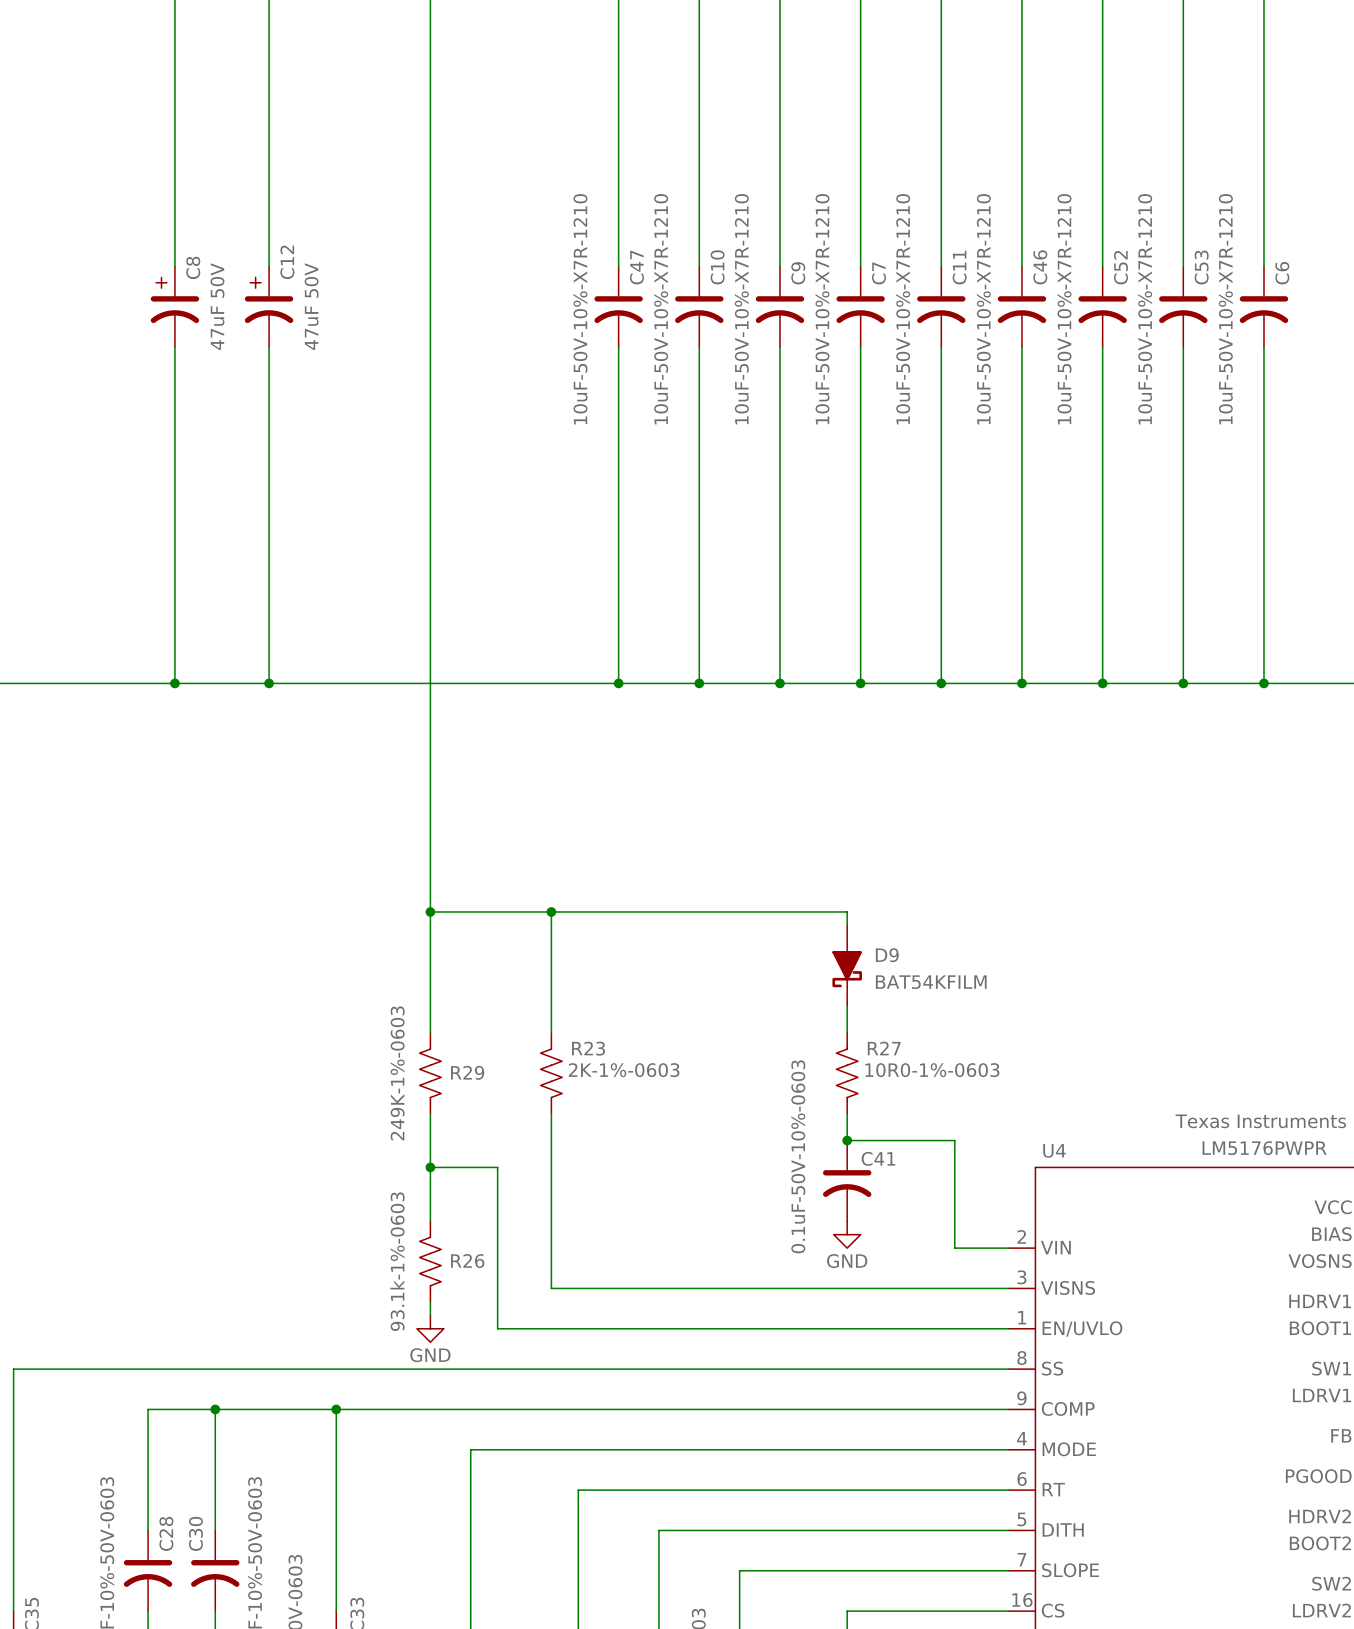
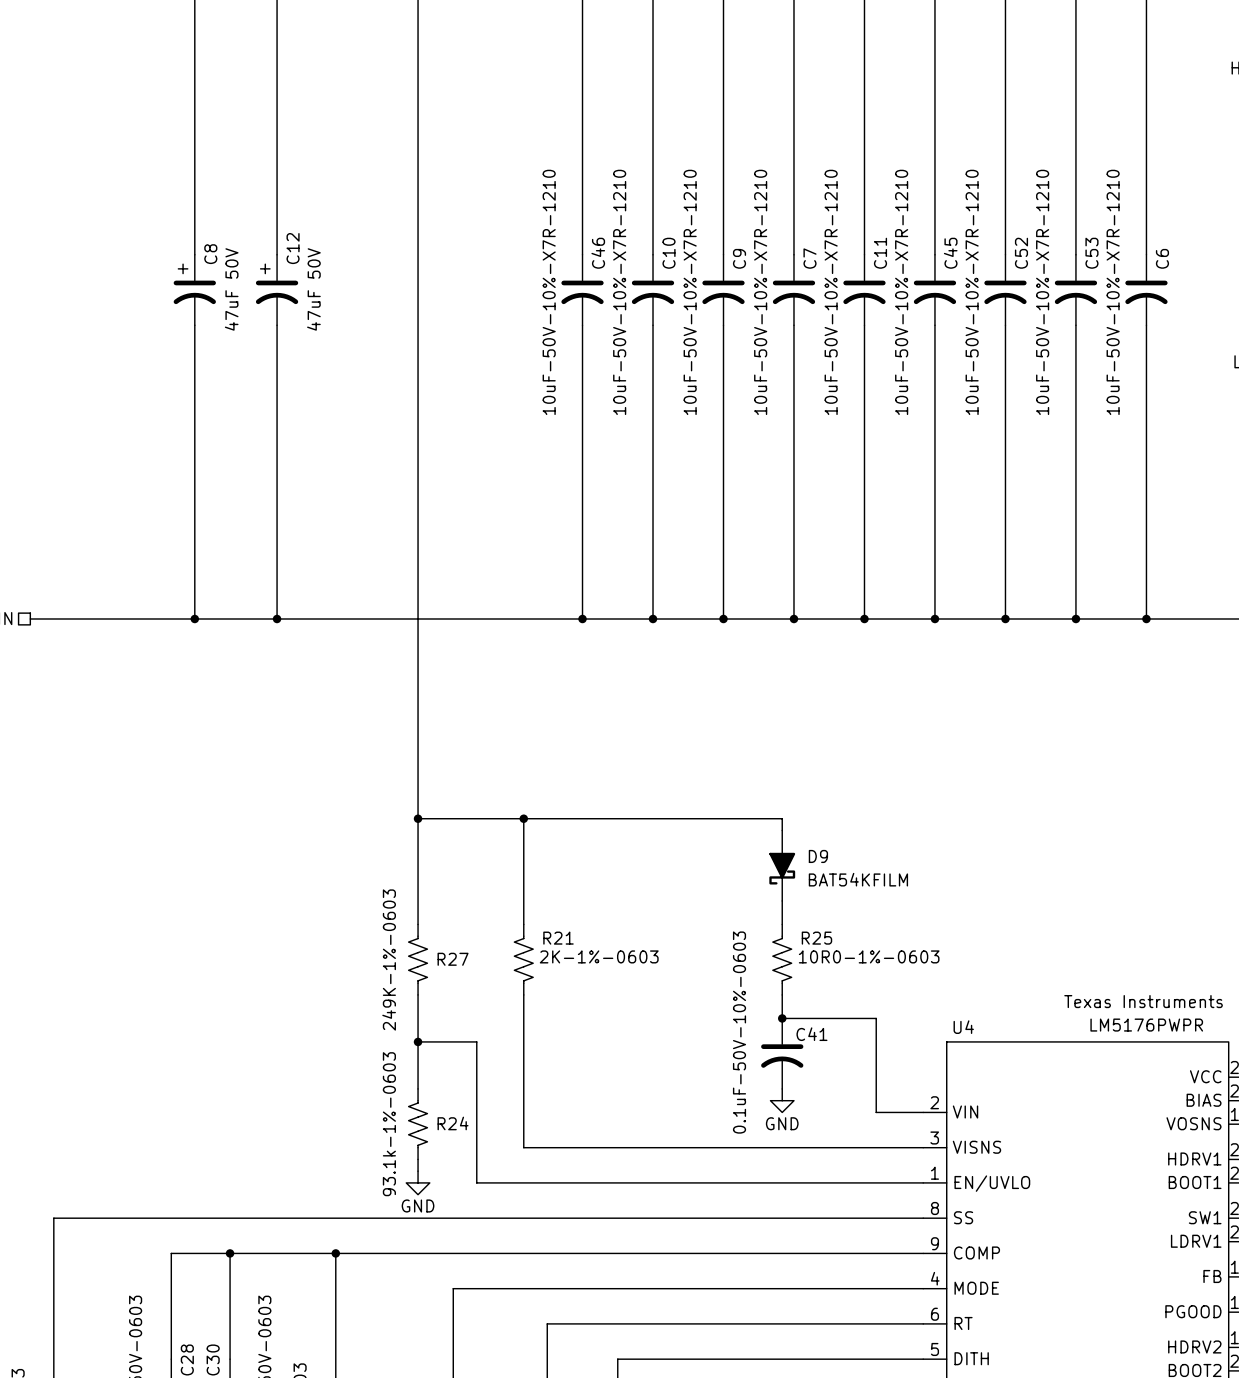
C47 name: C47 (636, 267) -> C46 (598, 253)
C46 name: C46 (1040, 267) -> C45 (950, 253)
R23 name: R23 (588, 1048) -> R21 (558, 938)
R27 name: R27 (884, 1048) -> R25 (816, 938)
R29 name: R29 (467, 1072) -> R27 (453, 959)
R26 name: R26 (467, 1261) -> R24 (453, 1123)

